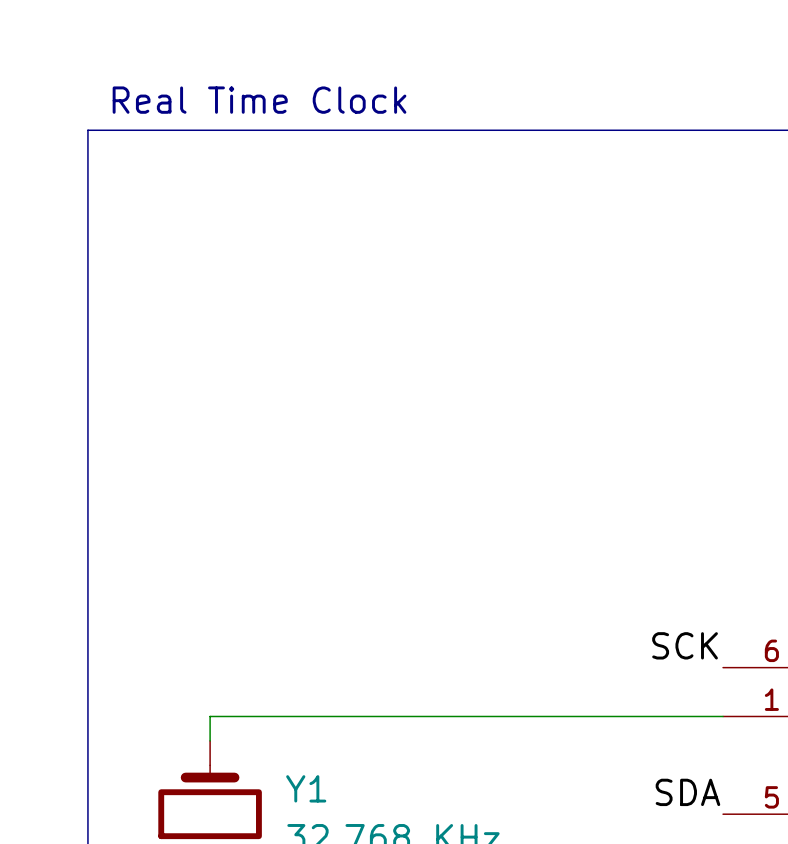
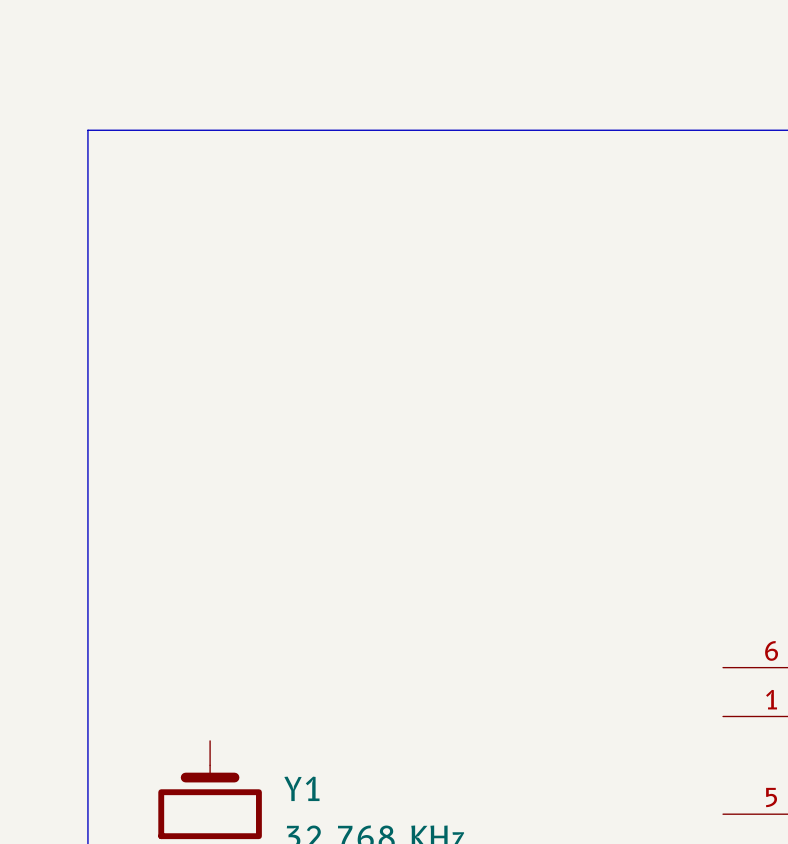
text: Real Time Clock (259, 100) -> none
label: SCK (685, 645) -> none
wire: (723, 716) (210, 716) (210, 740) -> none
label: SDA (687, 792) -> none

